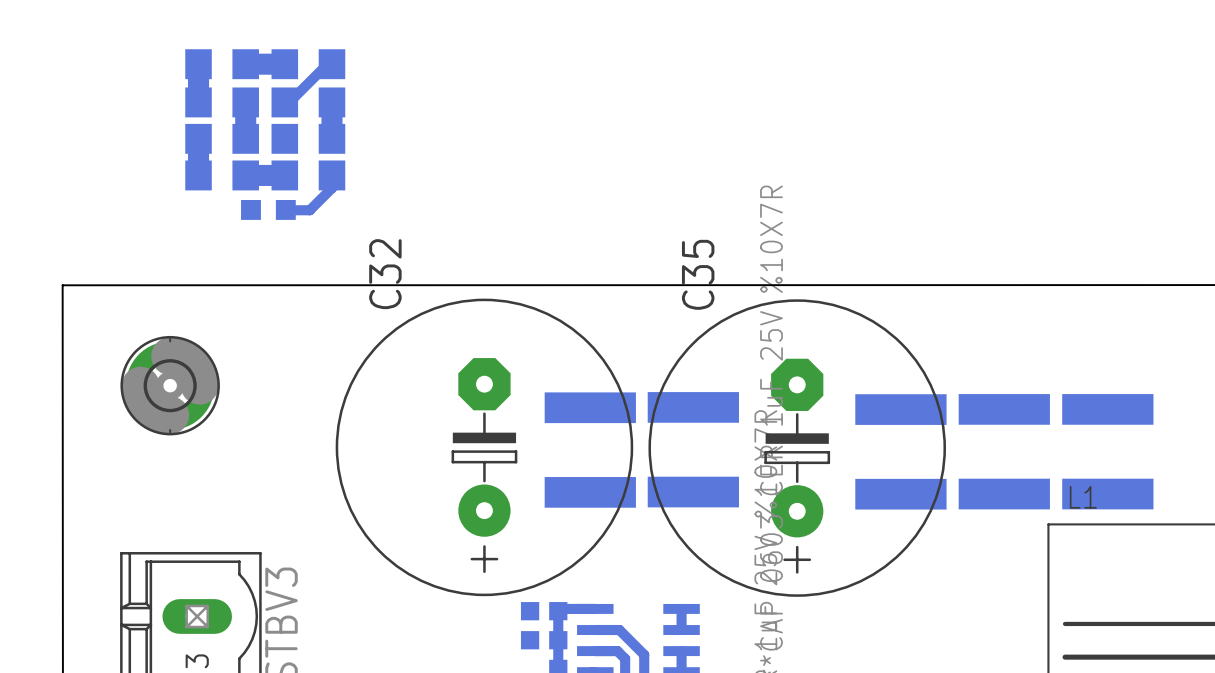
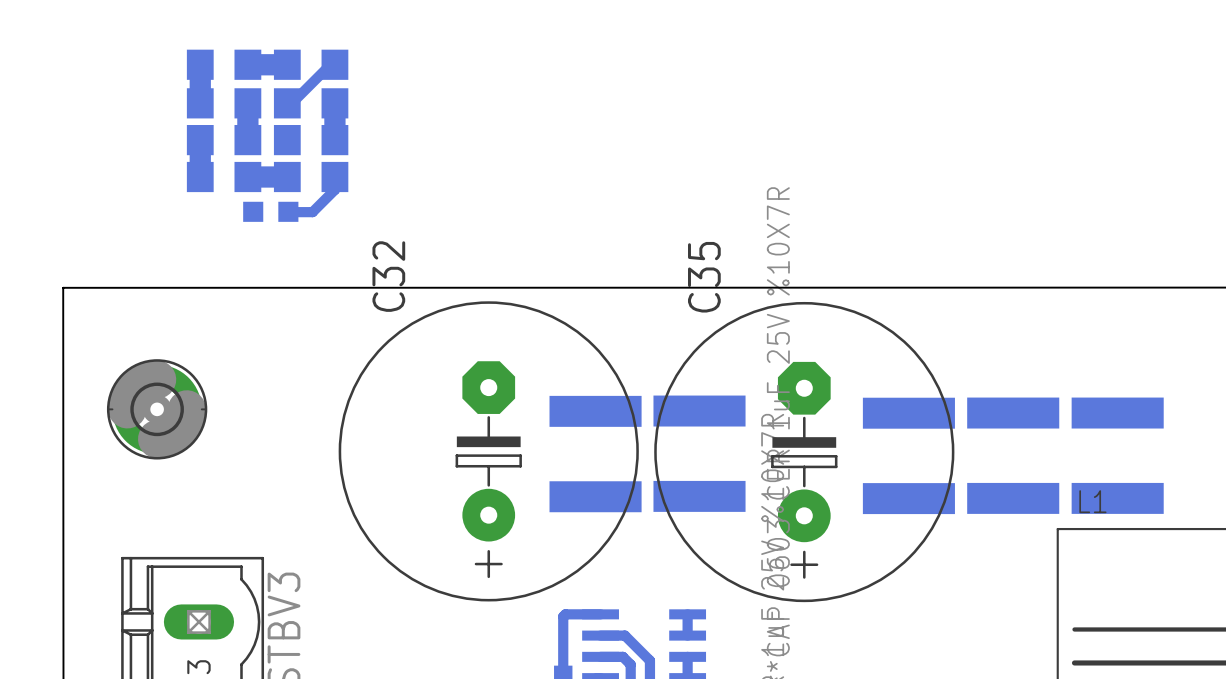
part rotation: 0° (170, 385) -> 90° clockwise (157, 409)
part: (544, 611) -> none
part: (544, 640) -> none

